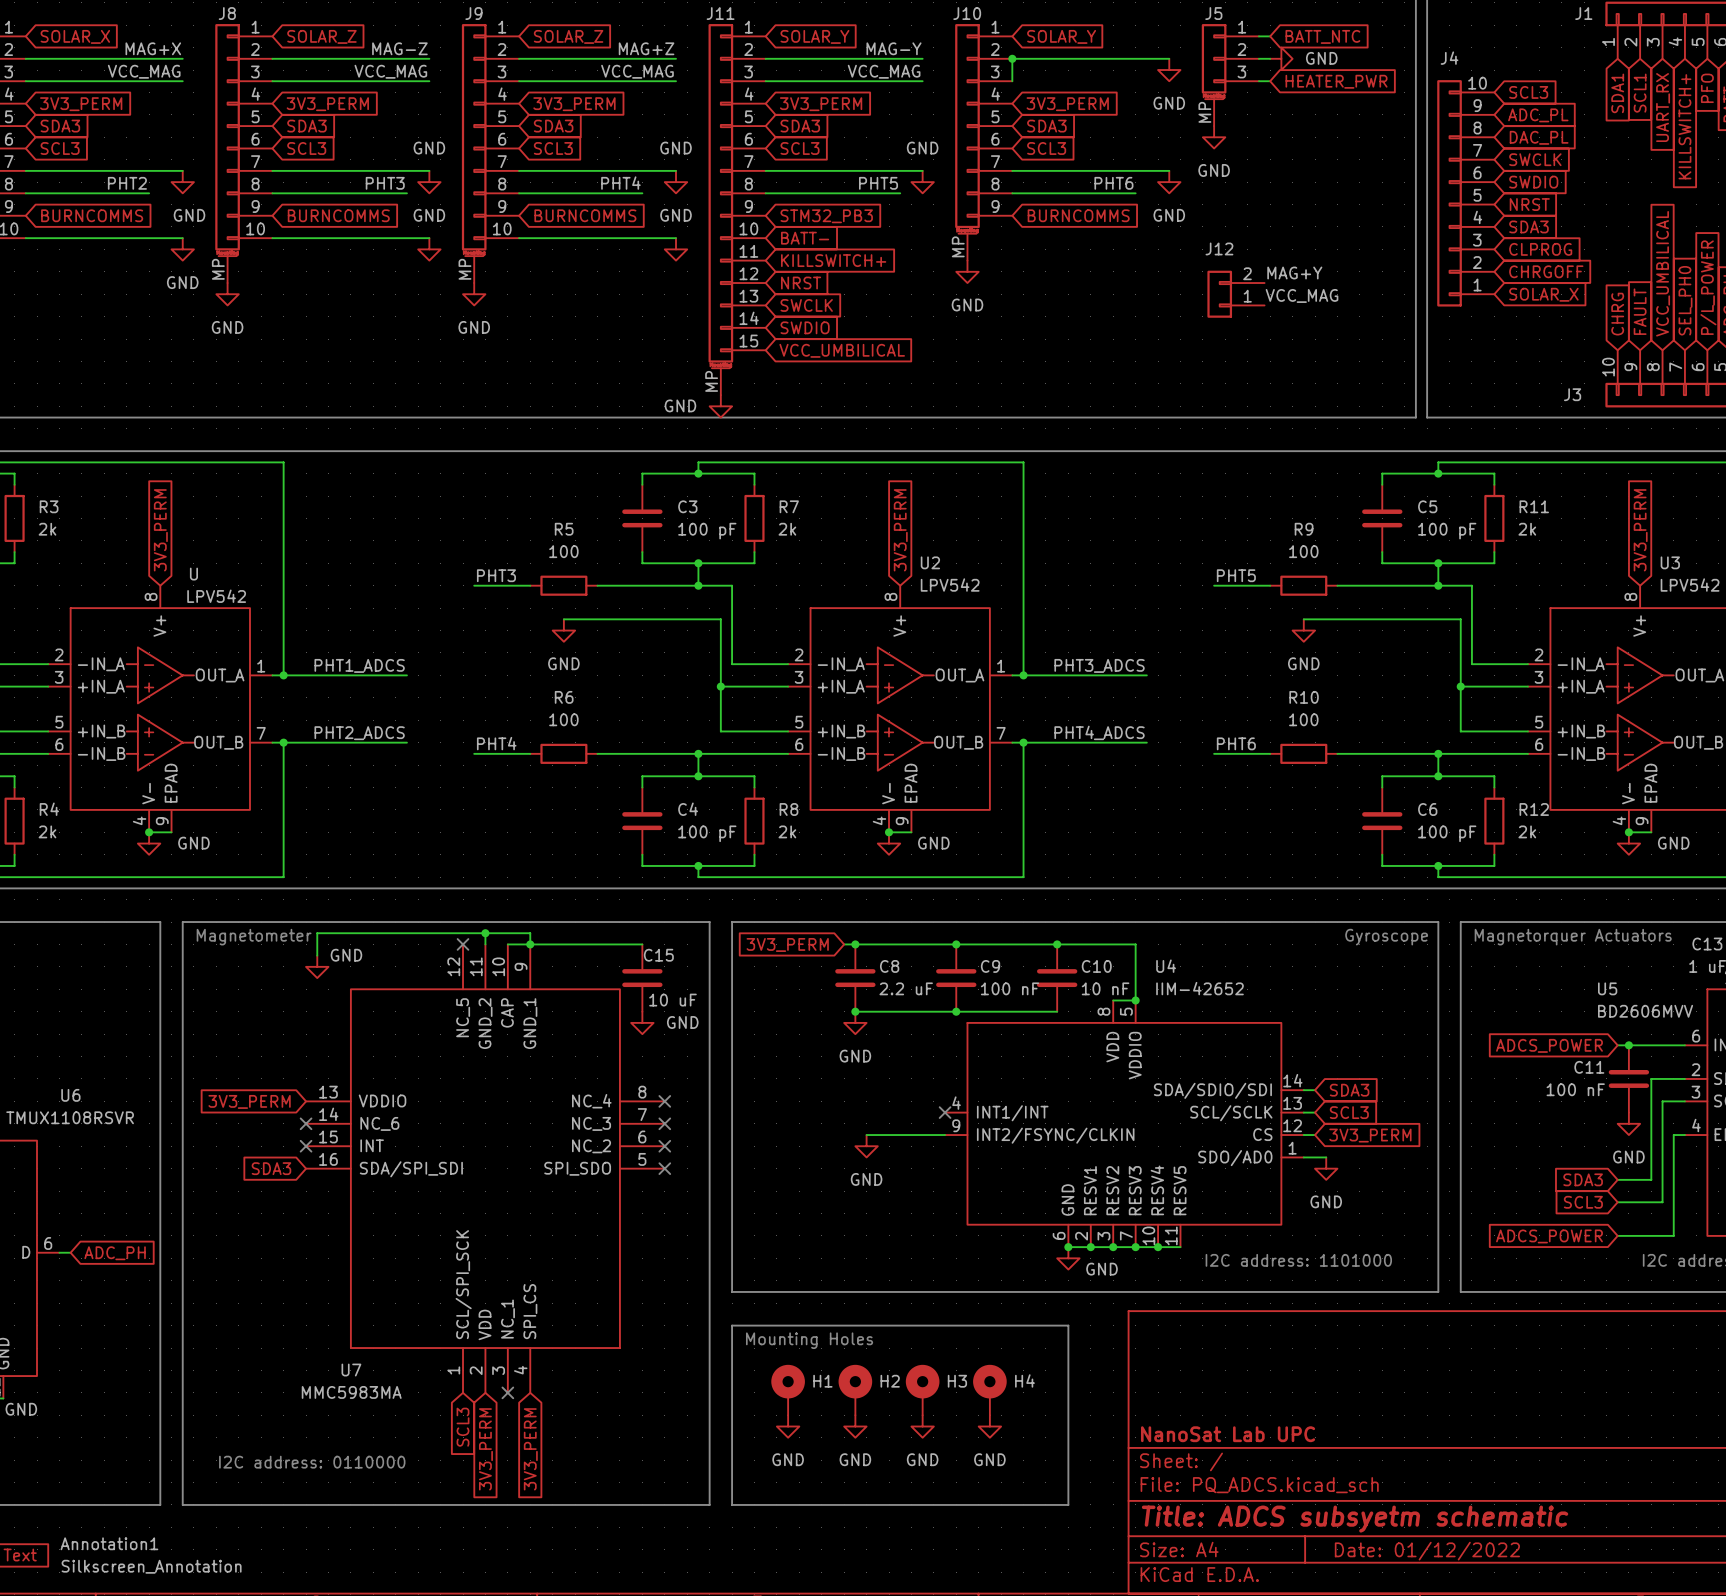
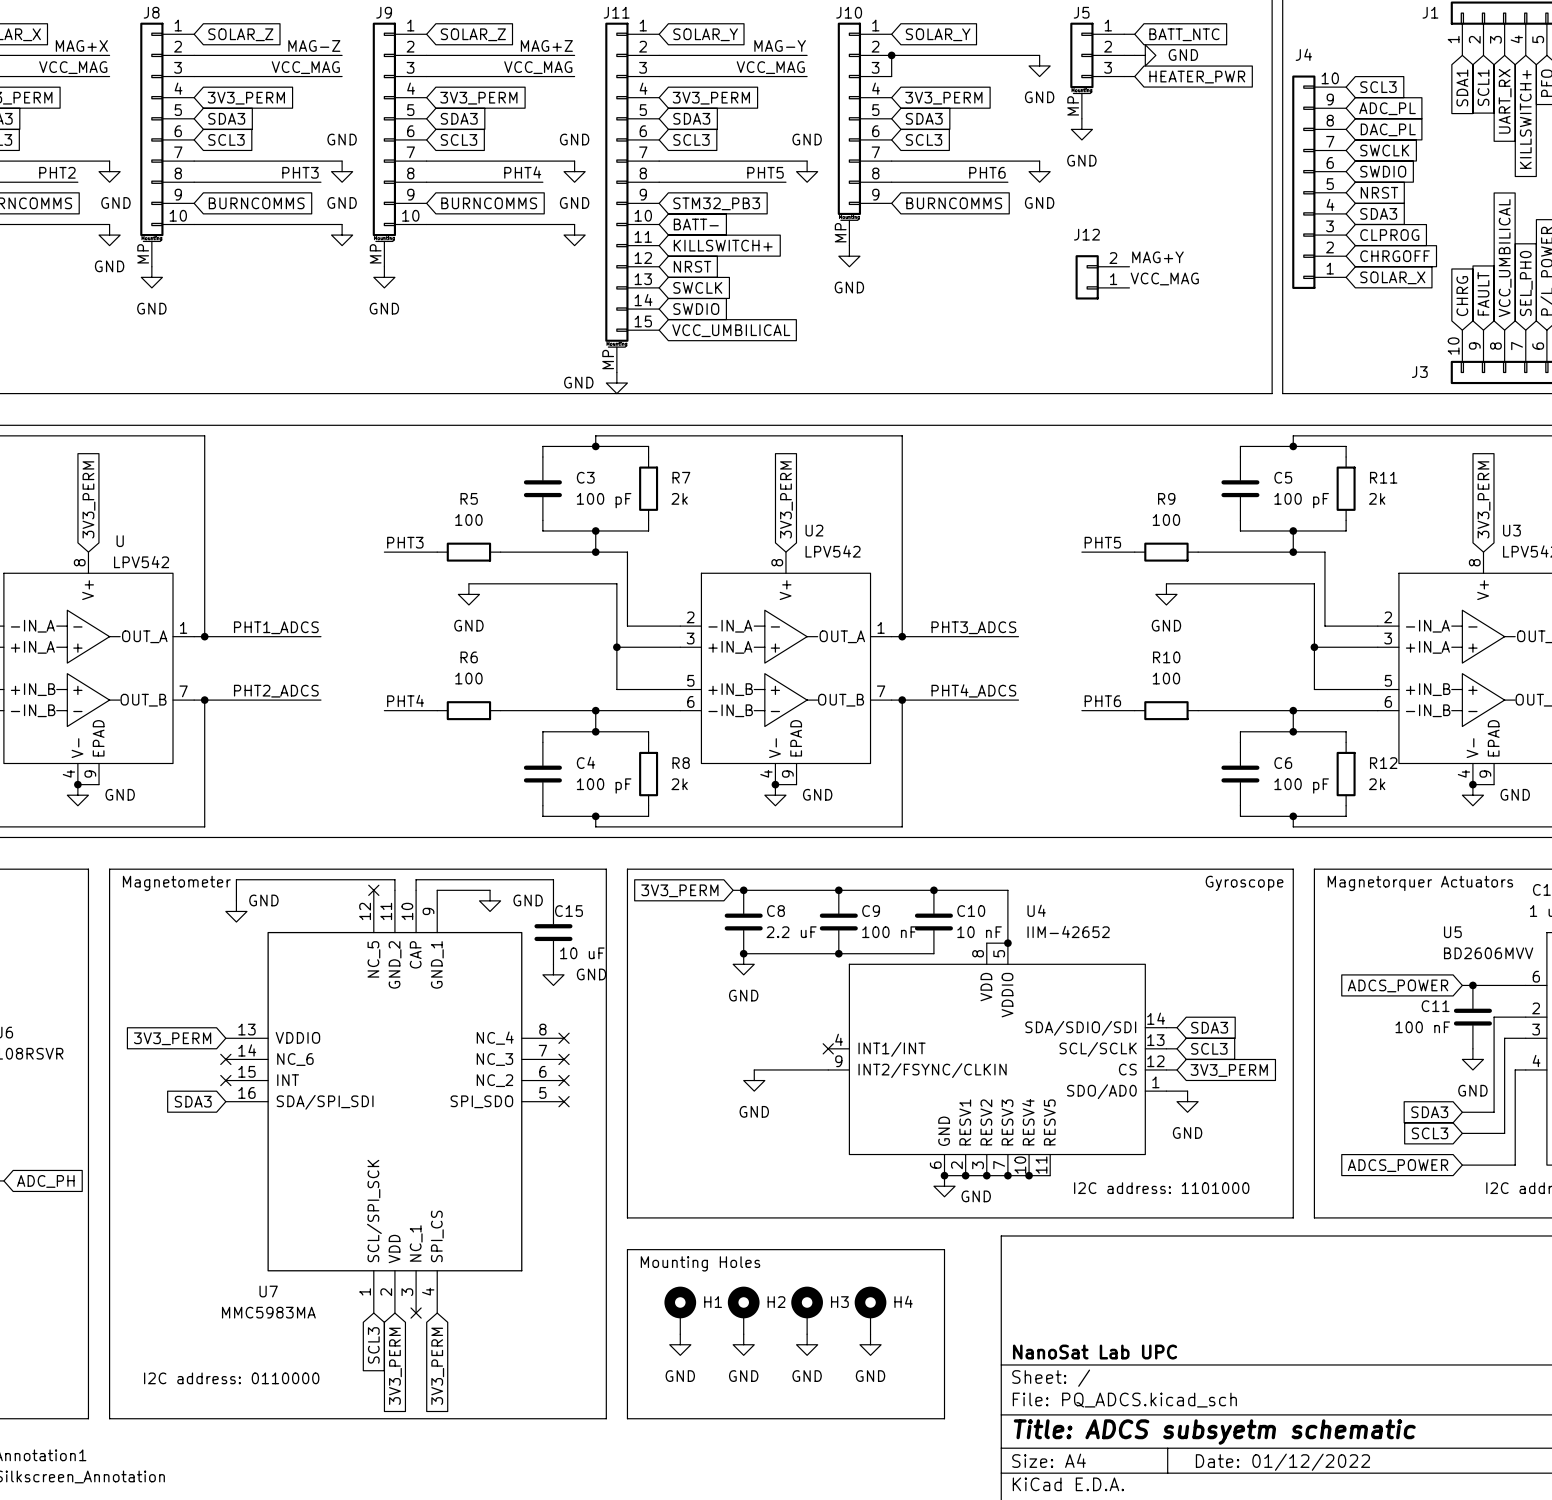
wire: (485, 933) (507, 933) -> none
junction: (485, 933) -> none
wire: (530, 933) (530, 944) (507, 944) -> (416, 879) (416, 890)
wire: none -> (437, 879) (553, 879) (553, 900)
junction: (530, 944) -> none
wire: (586, 944) (642, 944) -> none
power symbol: none -> GND (490, 900)
C15 position: (642, 978) -> (553, 932)
power symbol position: GND (642, 1022) -> GND (553, 974)

